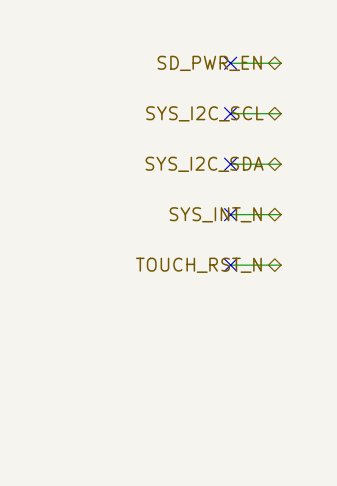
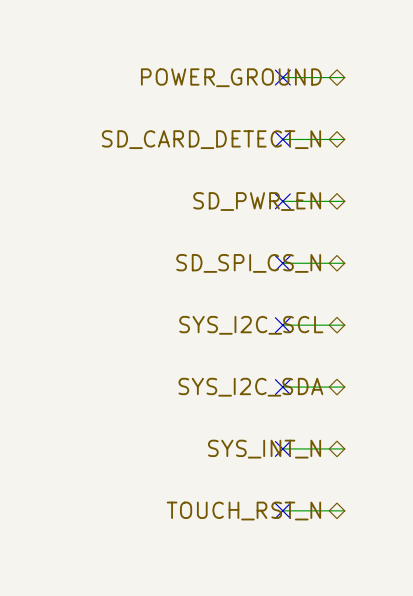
hierarchical label: SD_PWR_EN (209, 63) -> POWER_GROUND (231, 77)
hierarchical label: SYS_I2C_SCL (204, 113) -> SD_CARD_DETECT_N (211, 139)
hierarchical label: SYS_I2C_SDA (204, 164) -> SD_PWR_EN (257, 201)
hierarchical label: SYS_INT_N (215, 214) -> SD_SPI_CS_N (248, 263)
hierarchical label: TOUCH_RST_N (198, 265) -> SYS_I2C_SCL (251, 325)
hierarchical label: none -> SYS_I2C_SDA (250, 387)
wire: none -> (282, 387) (344, 387)
no-connect mark: none -> (282, 387)
hierarchical label: none -> SYS_INT_N (264, 449)
wire: none -> (282, 448) (344, 448)
no-connect mark: none -> (282, 448)
hierarchical label: none -> TOUCH_RST_N (243, 511)
wire: none -> (282, 510) (344, 510)
no-connect mark: none -> (282, 510)

